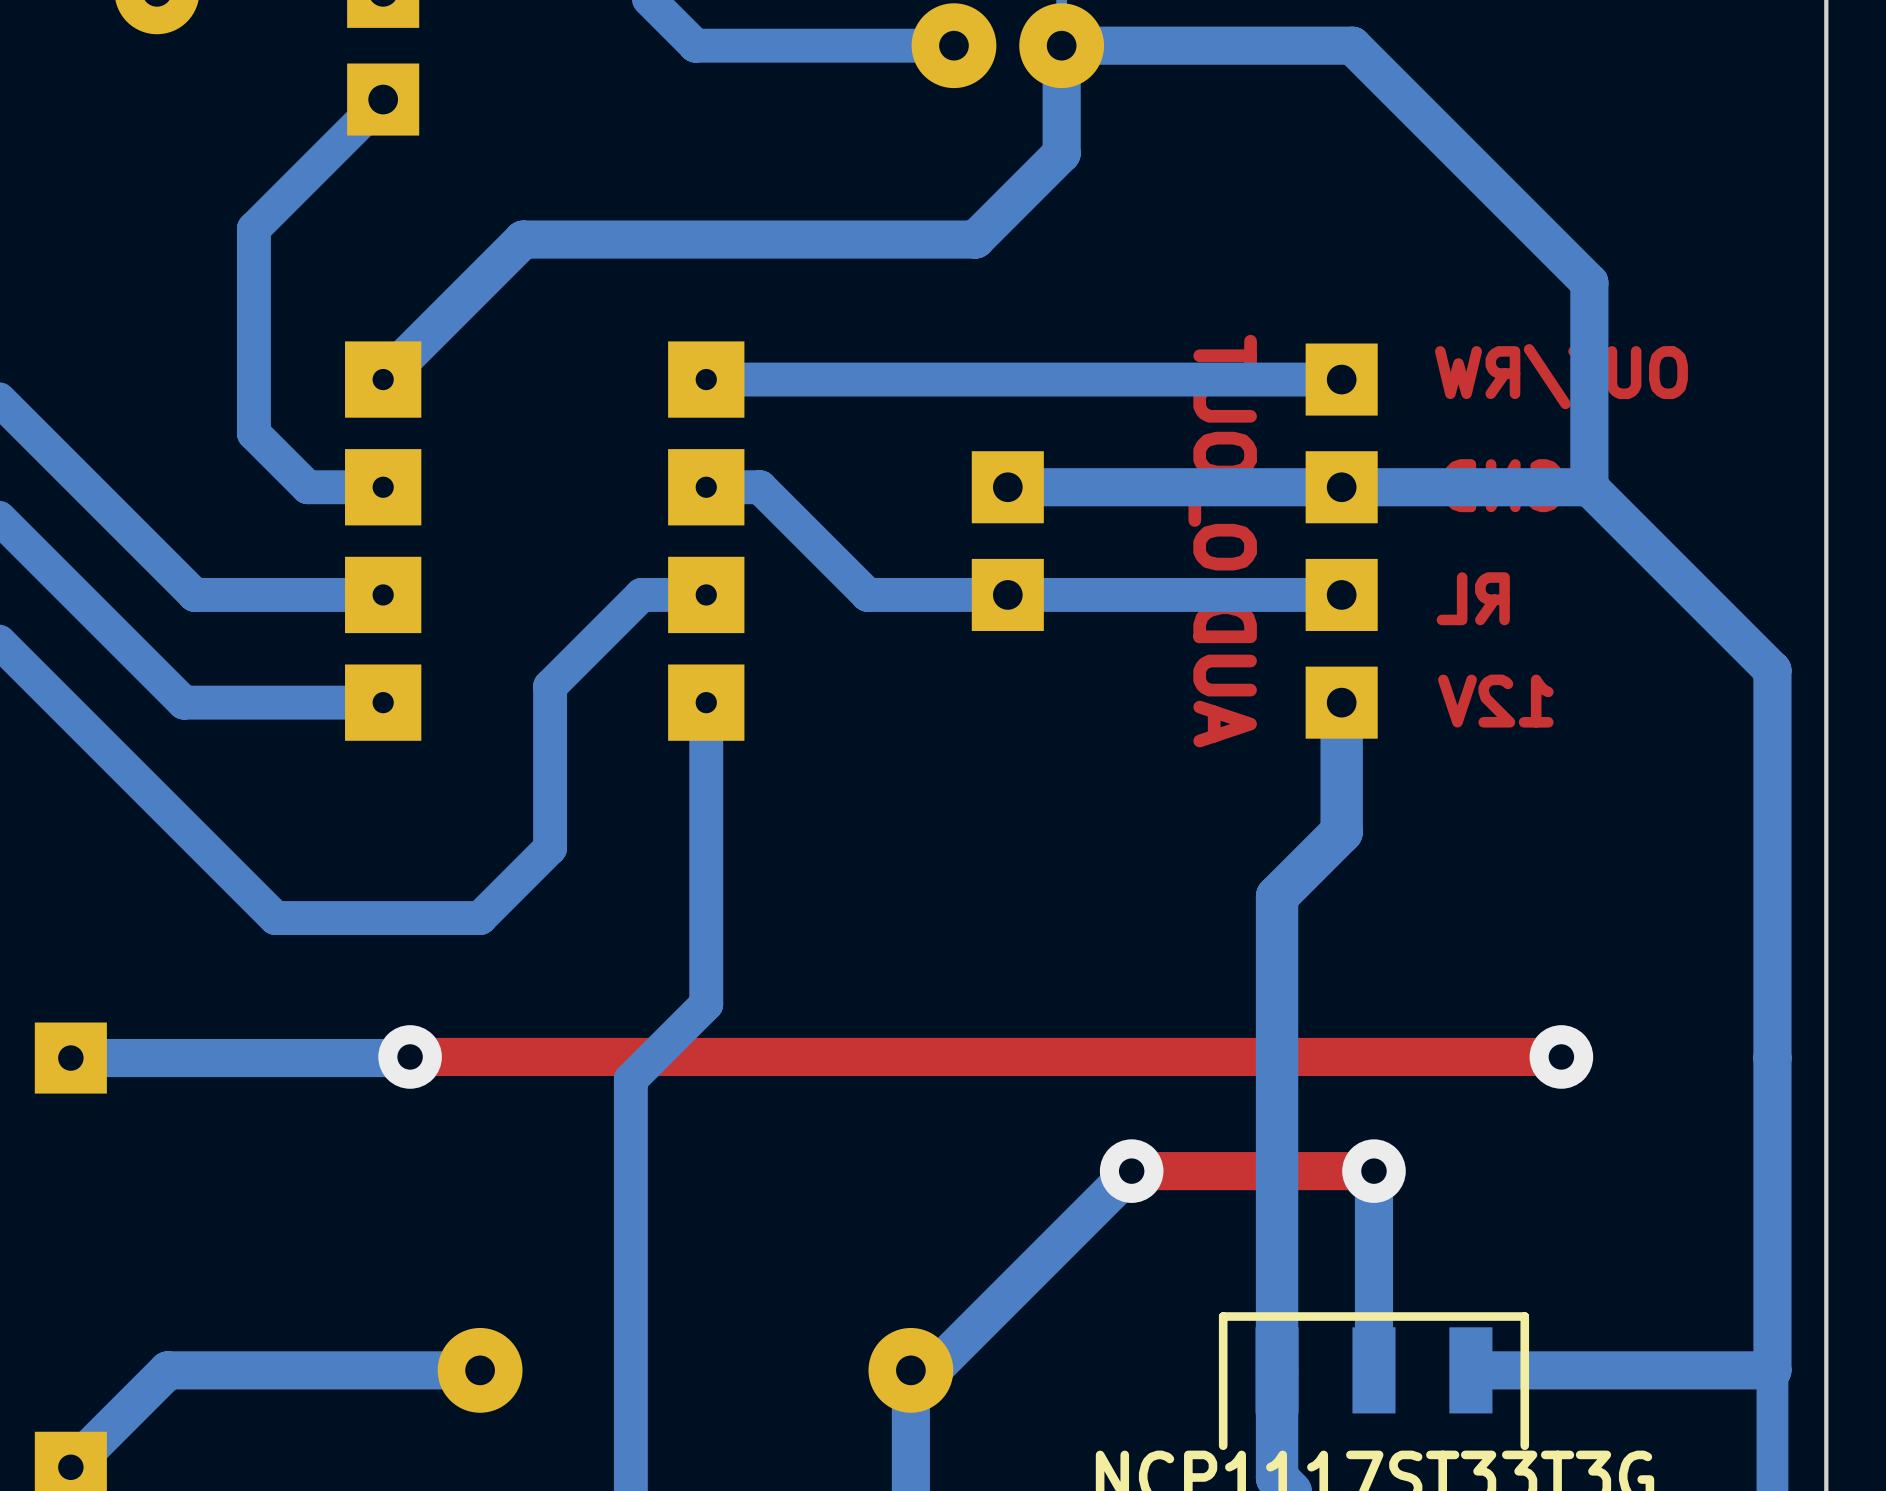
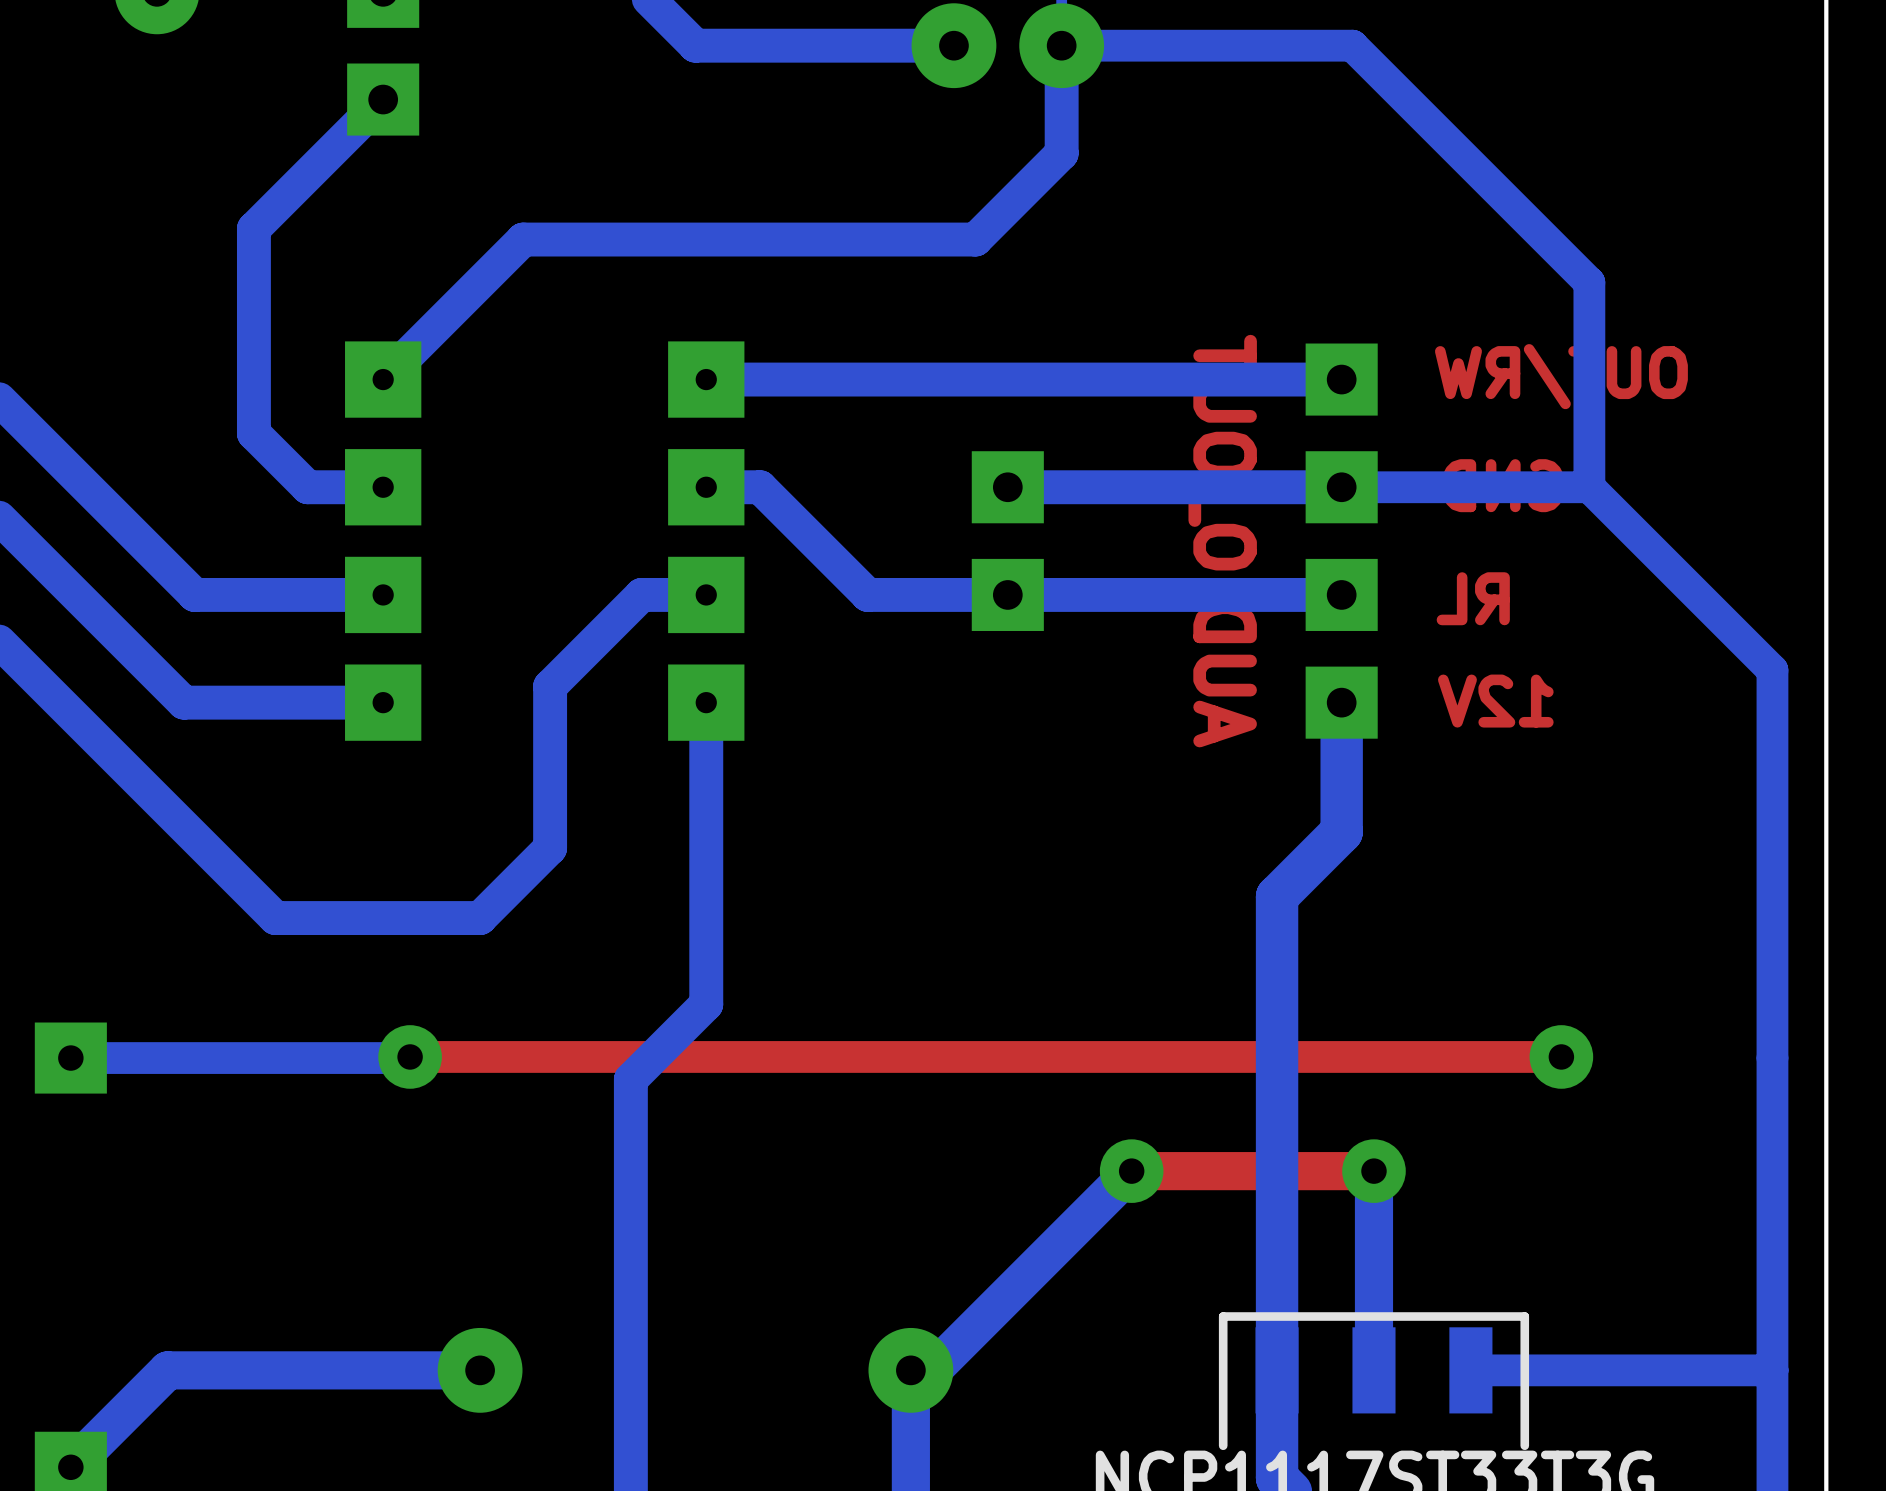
bottom track width: thick (383, 379) (523, 239) (975, 239) (1061, 153) (1061, 45) (1352, 45) (1589, 282) (1589, 487) -> thin (383, 379) (523, 239) (975, 239) (1061, 153) (1061, 45) (1352, 45) (1589, 282) (1589, 487)
bottom track width: thick (1589, 487) (1007, 487) -> thin (1589, 487) (1007, 487)
bottom track width: thick (1589, 487) (1772, 670) (1772, 1370) (1470, 1370) -> thin (1589, 487) (1772, 670) (1772, 1370) (1470, 1370)
bottom track width: thick (410, 1056) (70, 1058) -> thin (410, 1056) (70, 1058)
top track width: thick (1561, 1056) (410, 1056) -> thin (1561, 1056) (410, 1056)

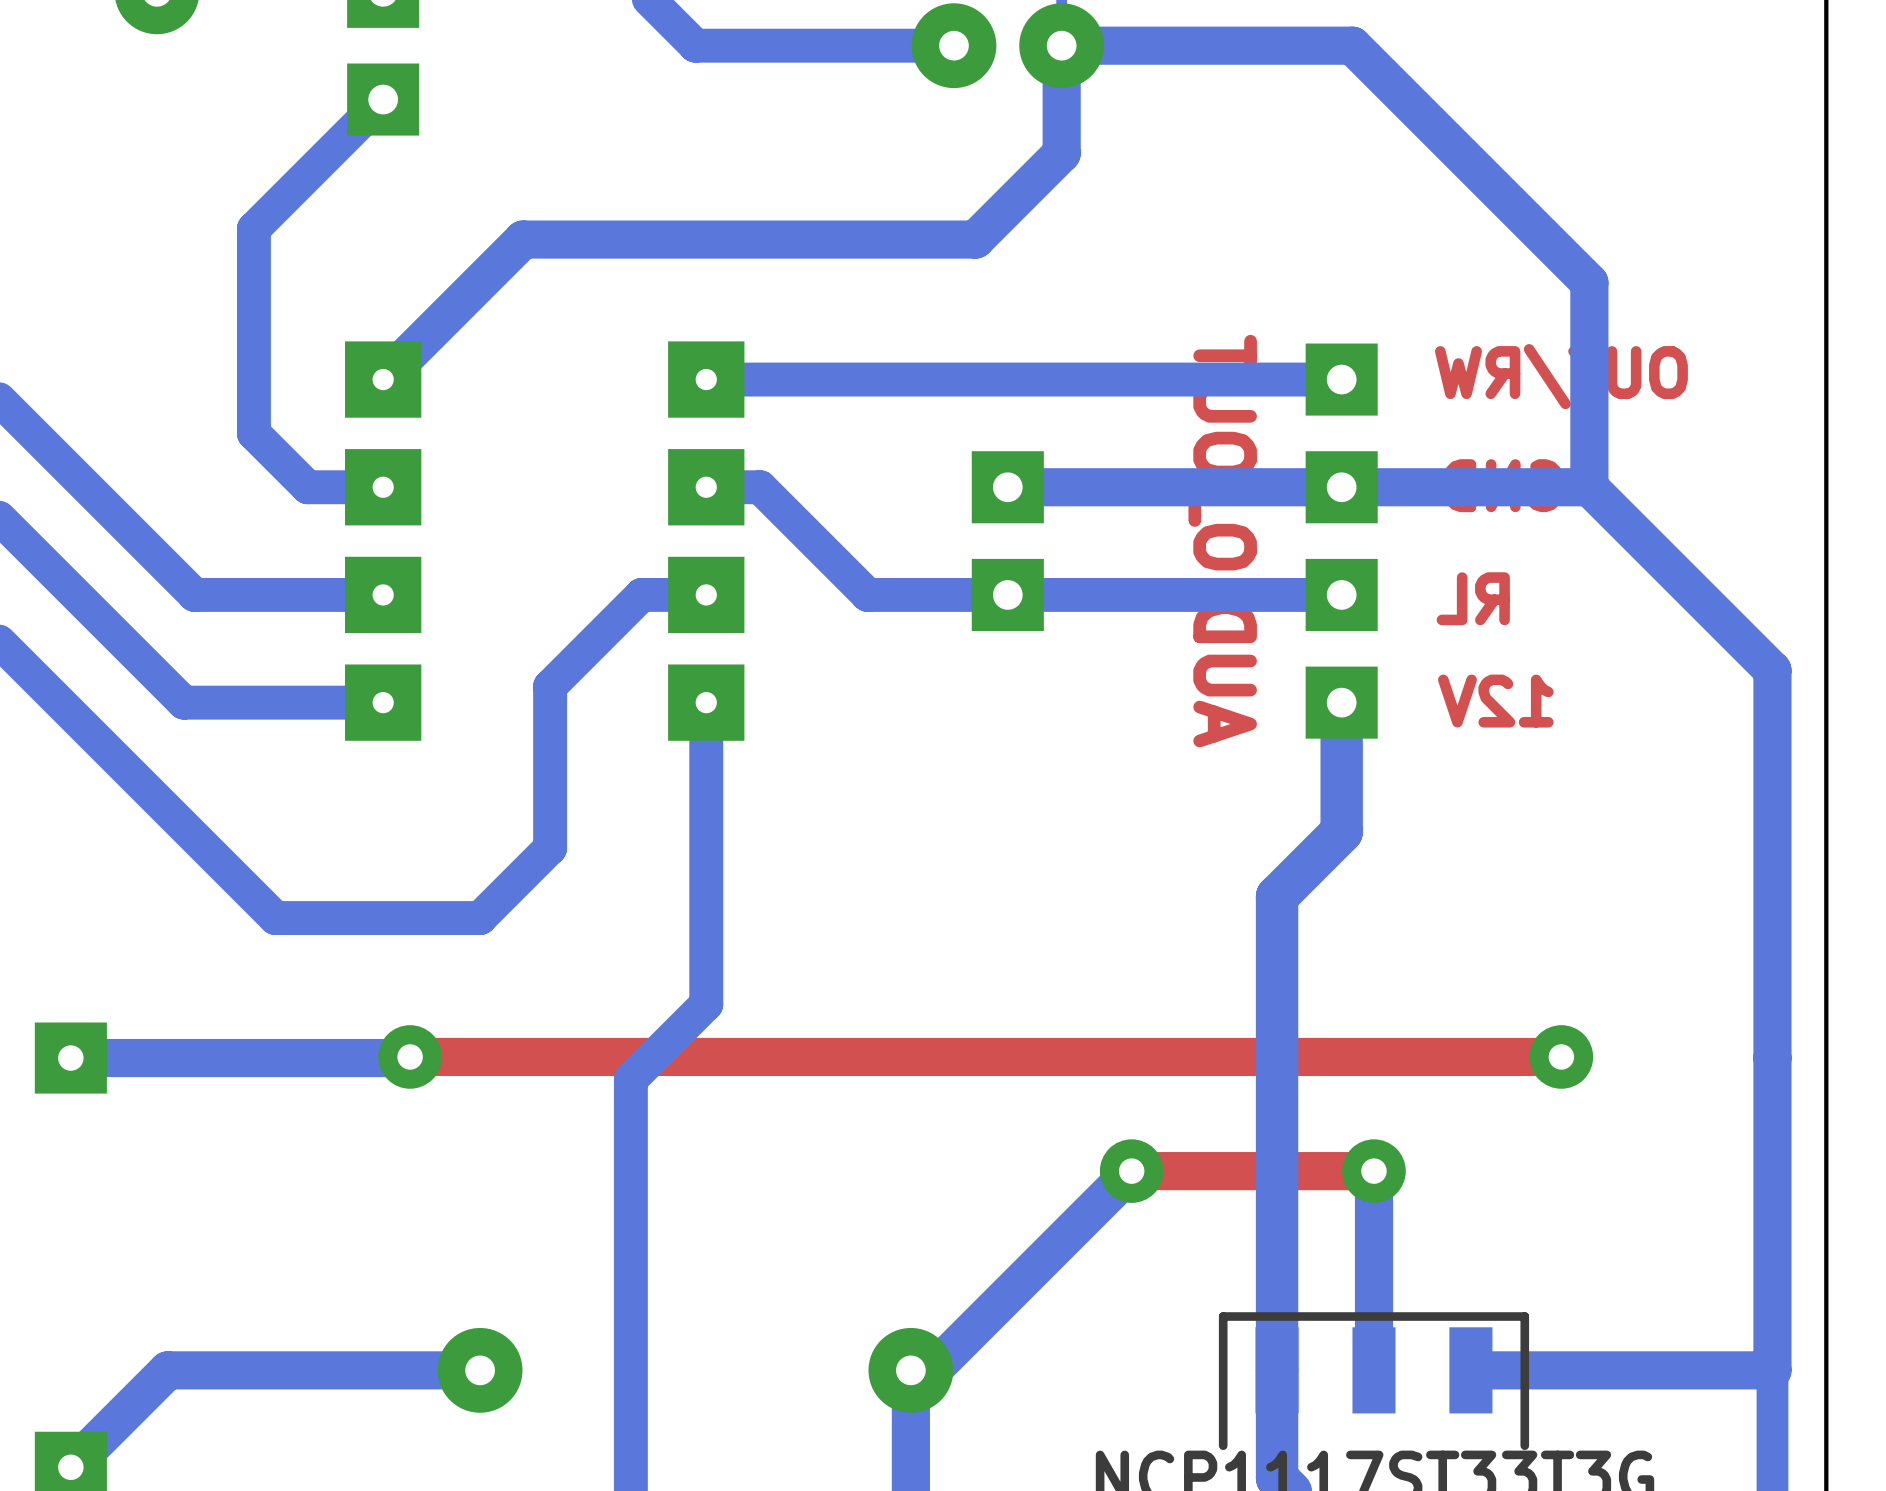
bottom track width: thin (383, 379) (523, 239) (975, 239) (1061, 153) (1061, 45) (1352, 45) (1589, 282) (1589, 487) -> thick (383, 379) (523, 239) (975, 239) (1061, 153) (1061, 45) (1352, 45) (1589, 282) (1589, 487)
bottom track width: thin (1589, 487) (1007, 487) -> thick (1589, 487) (1007, 487)
bottom track width: thin (1589, 487) (1772, 670) (1772, 1370) (1470, 1370) -> thick (1589, 487) (1772, 670) (1772, 1370) (1470, 1370)
bottom track width: thin (410, 1056) (70, 1058) -> thick (410, 1056) (70, 1058)
top track width: thin (1561, 1056) (410, 1056) -> thick (1561, 1056) (410, 1056)

